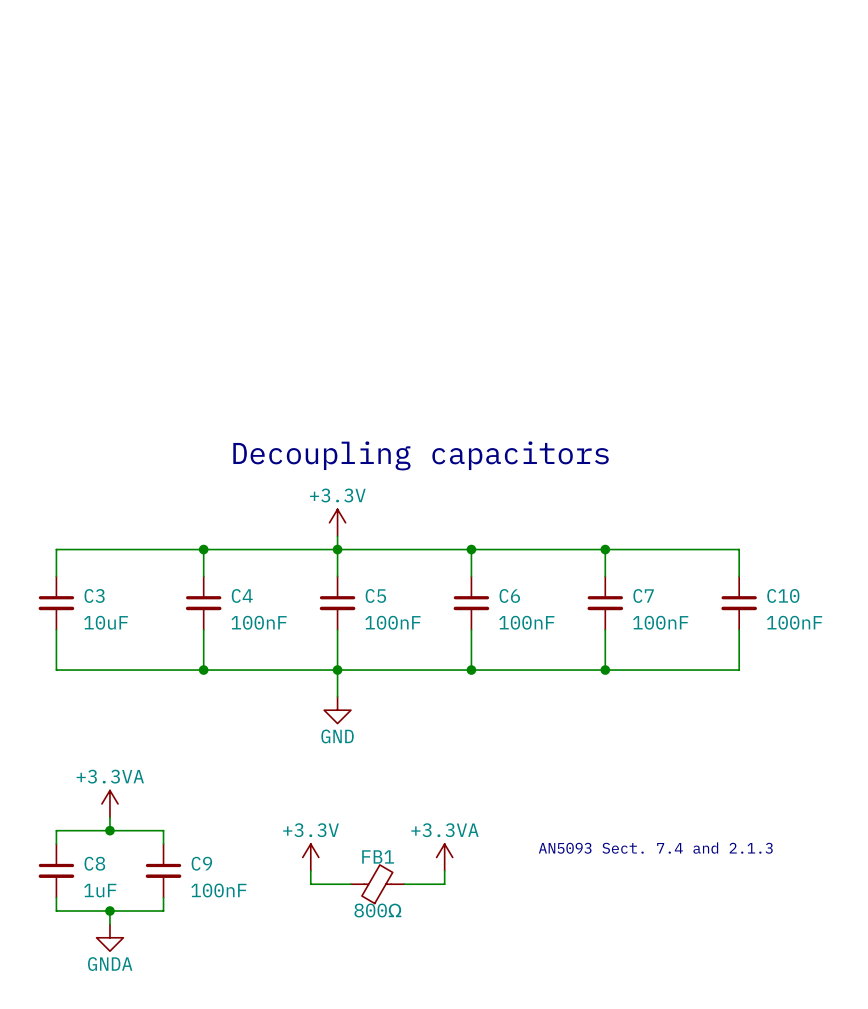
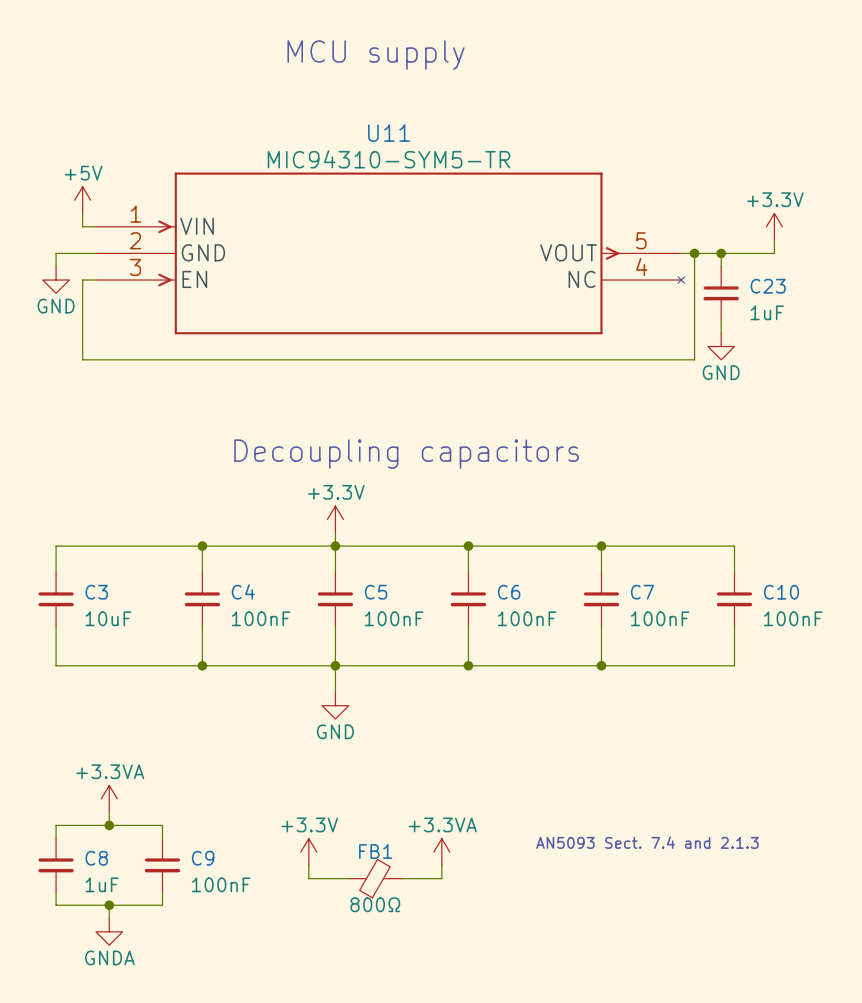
text: none -> MCU supply (376, 55)
power symbol: none -> +5V (82, 200)
wire: none -> (82, 213) (82, 226) (95, 226)
power symbol: none -> +3.3V (774, 226)
wire: none -> (774, 240) (774, 253) (681, 253)
wire: none -> (95, 253) (56, 253) (56, 266)
U11: none -> MIC94310-SYM5-TR (390, 253)
wire: none -> (694, 253) (694, 359) (82, 359) (82, 280) (95, 280)
junction: none -> (694, 253)
wire: none -> (721, 253) (721, 266)
junction: none -> (721, 253)
power symbol: none -> GND (56, 280)
C23: none -> 1uF (721, 293)
wire: none -> (721, 319) (721, 333)
power symbol: none -> GND (721, 346)

